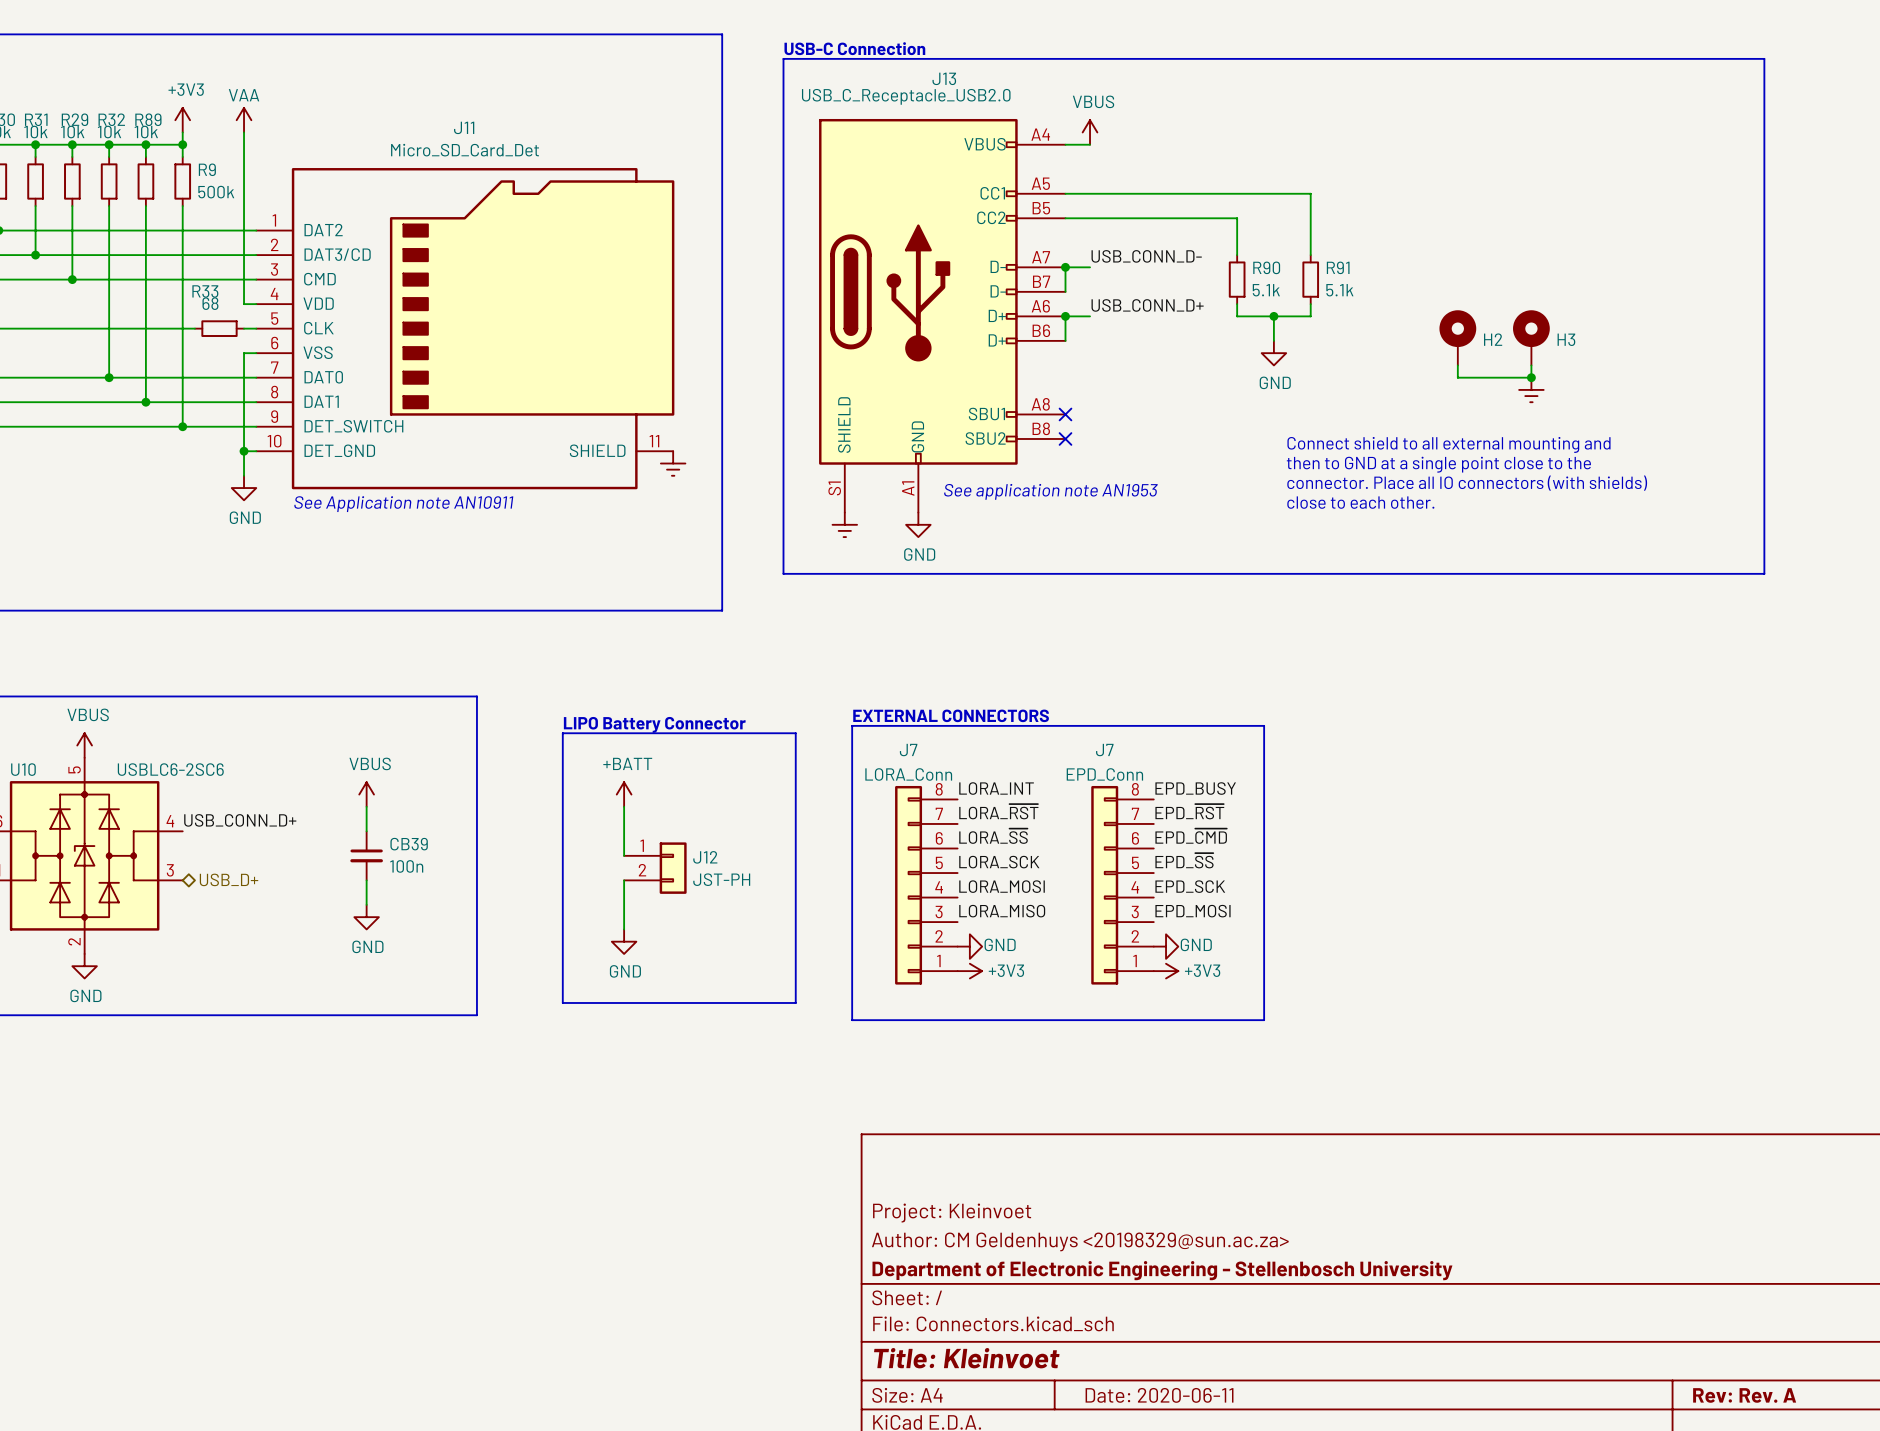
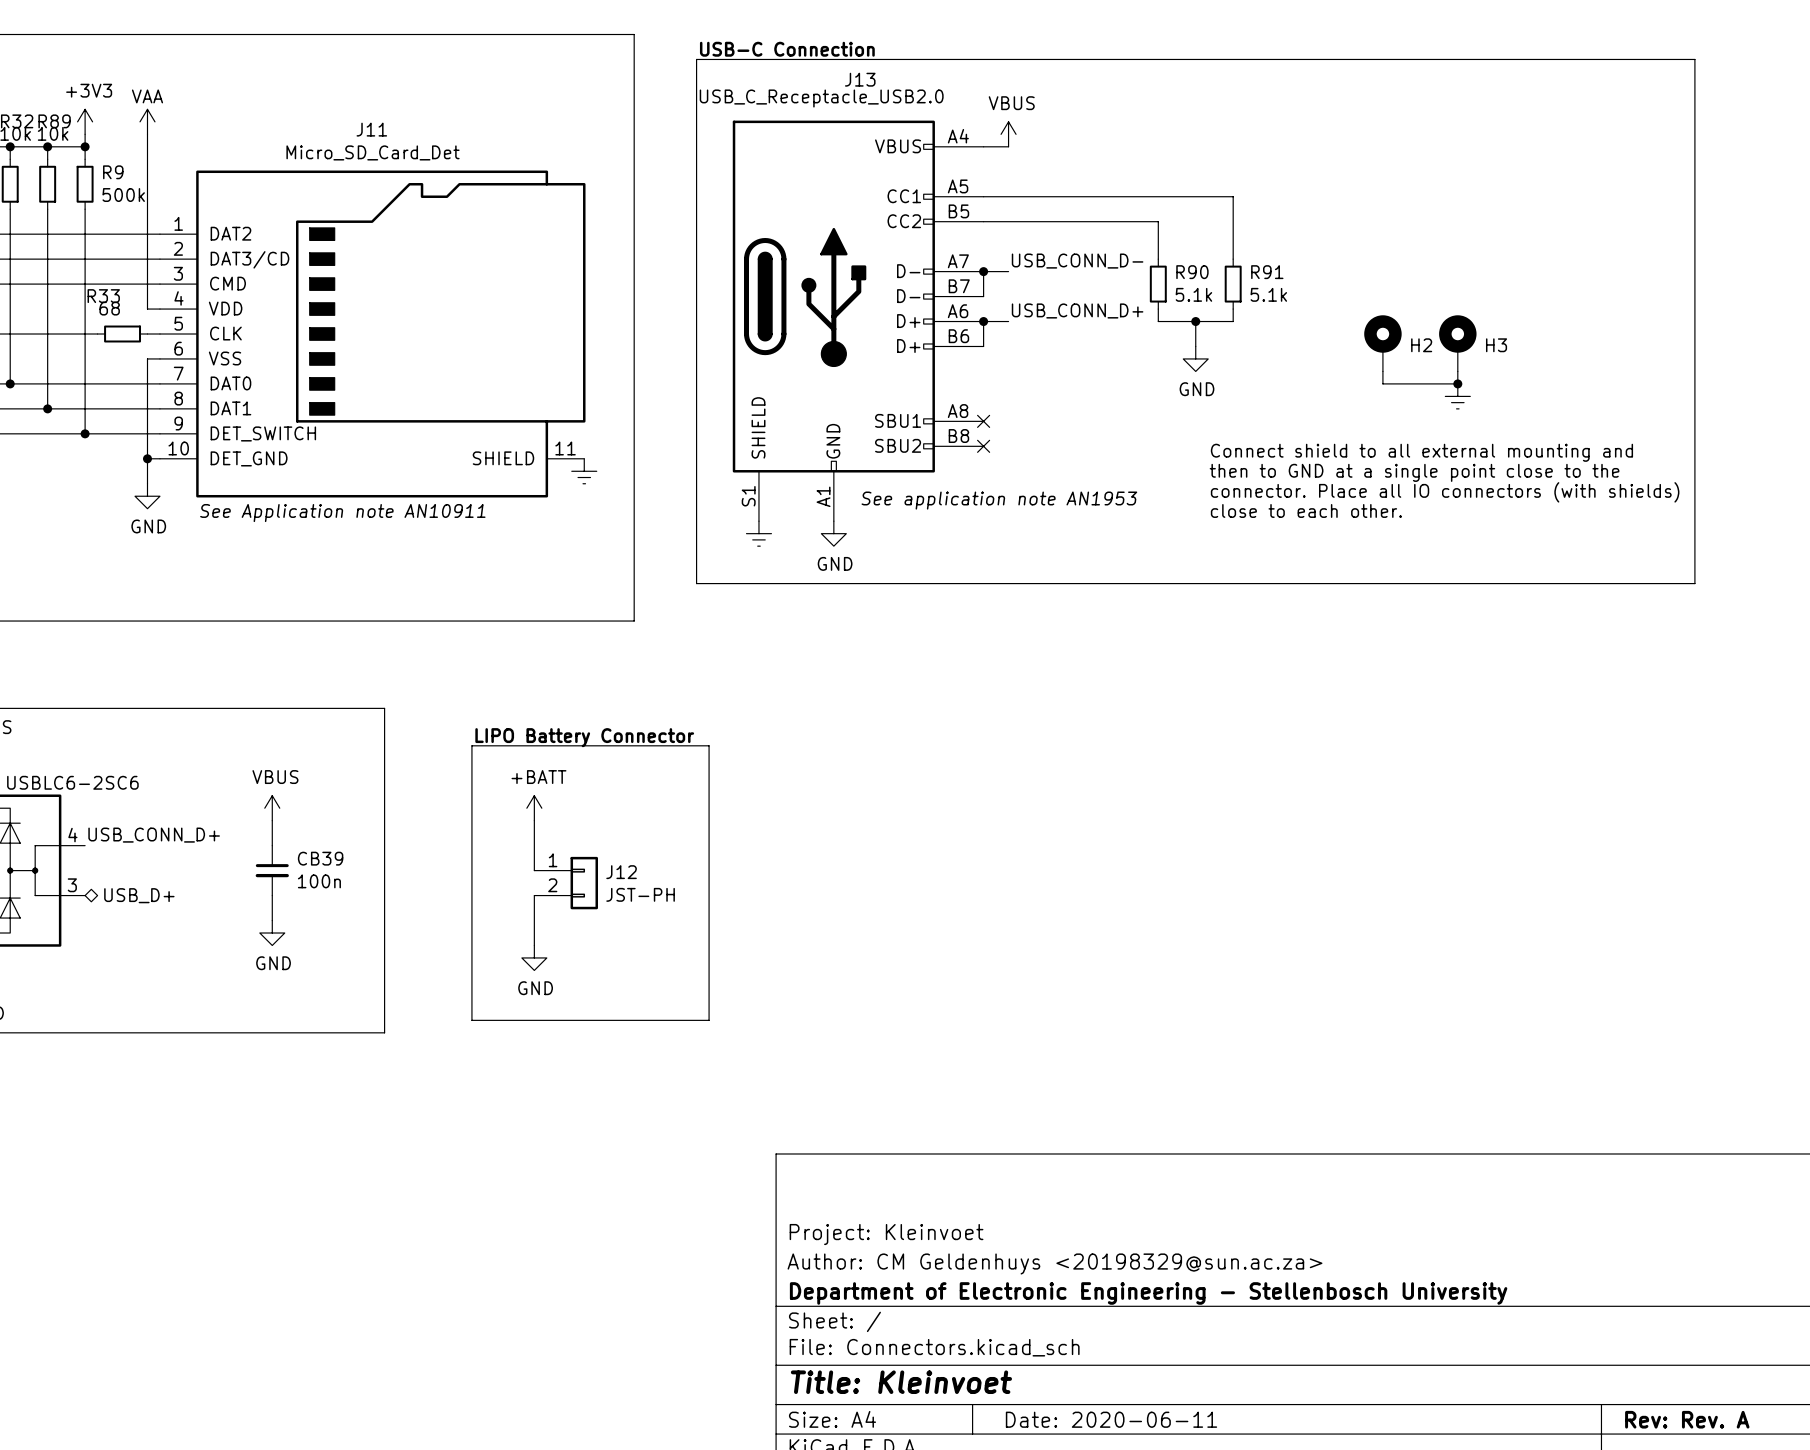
text: EXTERNAL CONNECTORS (951, 715) -> none
line: (852, 725) (1264, 725) (1264, 1020) (852, 1020) (852, 725) -> none
label: LORA_INT (996, 788) -> none
label: EPD_BUSY (1195, 788) -> none
label: LORA_~{RST} (998, 811) -> none
label: EPD_~{RST} (1189, 811) -> none
label: LORA_~{SS} (993, 836) -> none
label: EPD_~{CMD} (1191, 836) -> none
label: EPD_~{SS} (1184, 860) -> none
label: LORA_SCK (999, 862) -> none
J7: LORA_Conn (926, 885) -> none
J7: EPD_Conn (1122, 885) -> none
label: LORA_MOSI (1002, 886) -> none
label: EPD_SCK (1190, 886) -> none
label: LORA_MISO (1002, 911) -> none
label: EPD_MOSI (1193, 911) -> none
power symbol: GND (969, 946) -> none
power symbol: GND (1166, 946) -> none
power symbol: +3V3 (969, 971) -> none
power symbol: +3V3 (1166, 971) -> none

